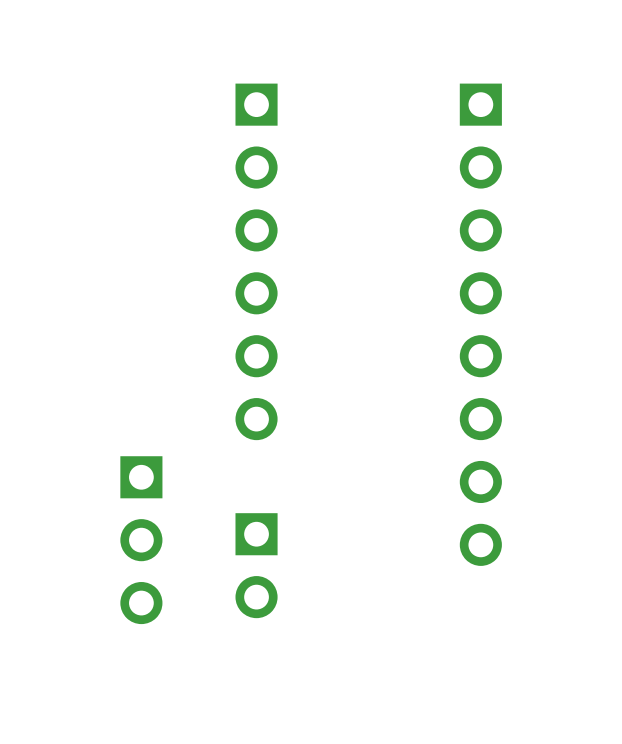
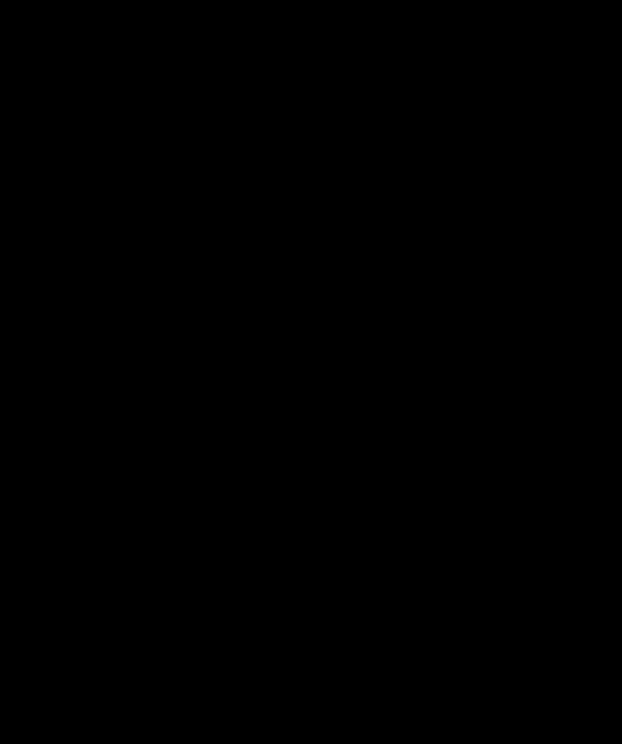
part: (256, 261) -> none
part: (480, 324) -> none
part: (141, 540) -> none
part: (256, 565) -> none

